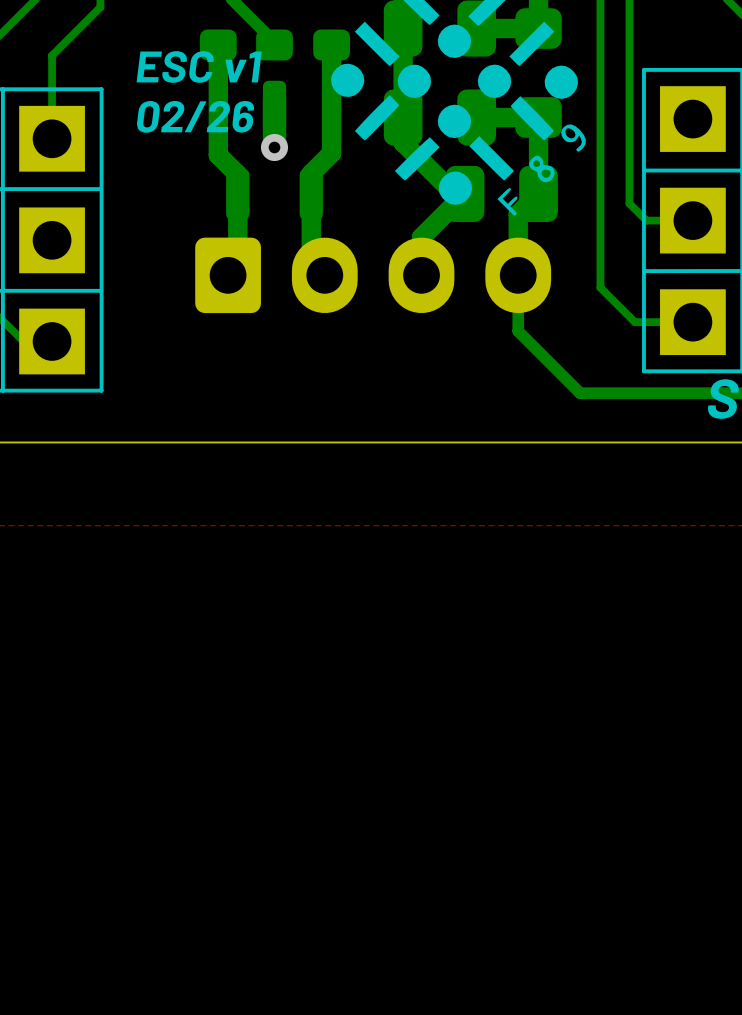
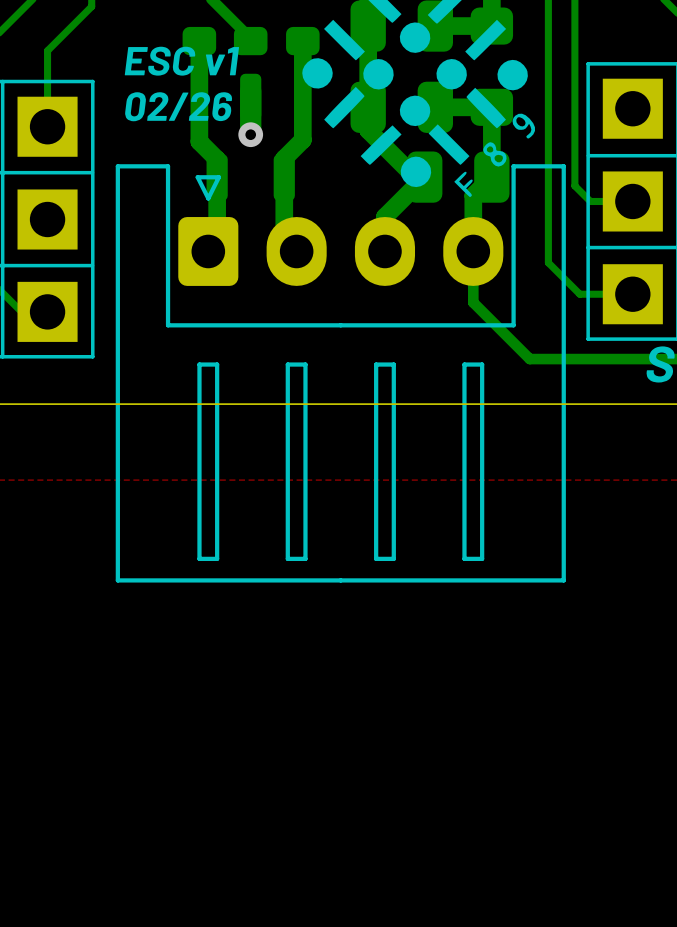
part: none -> (340, 373)

